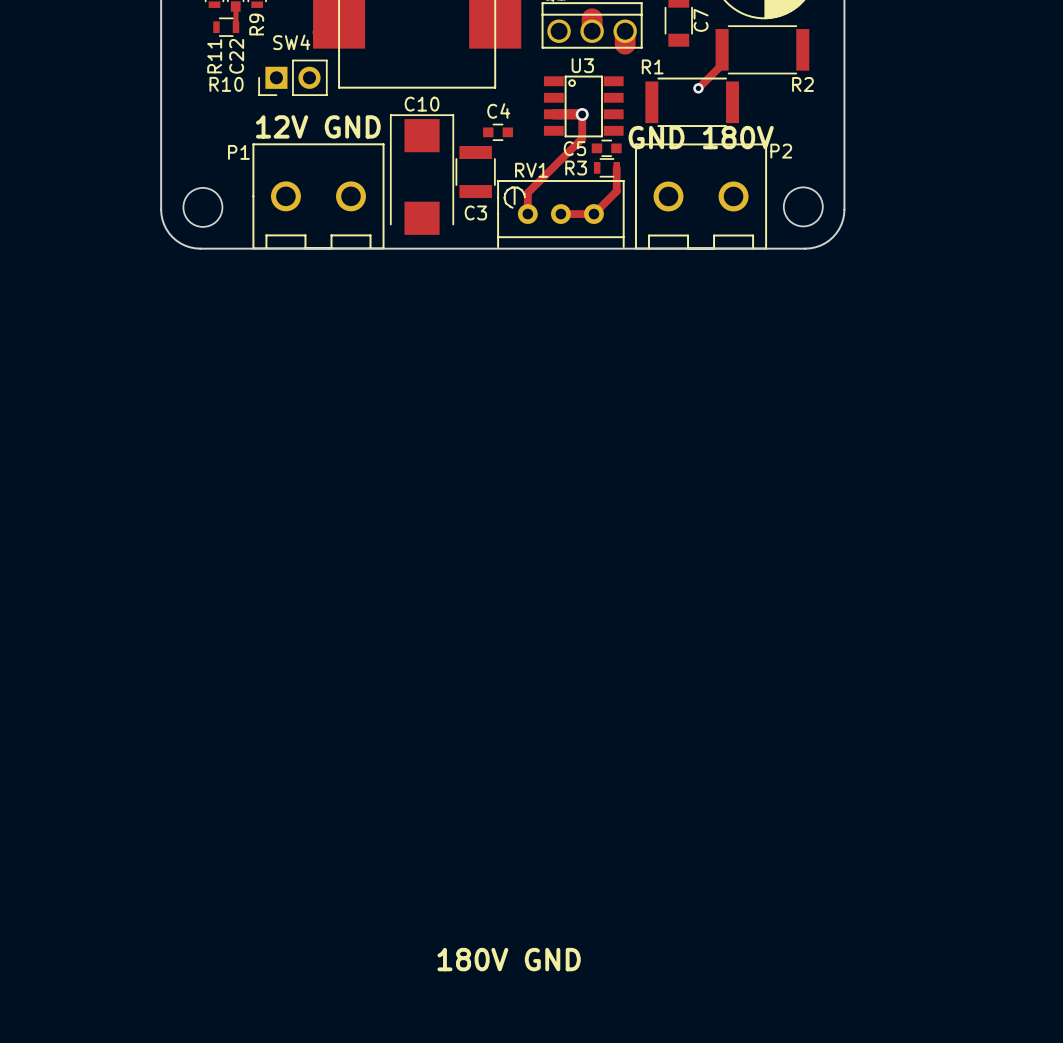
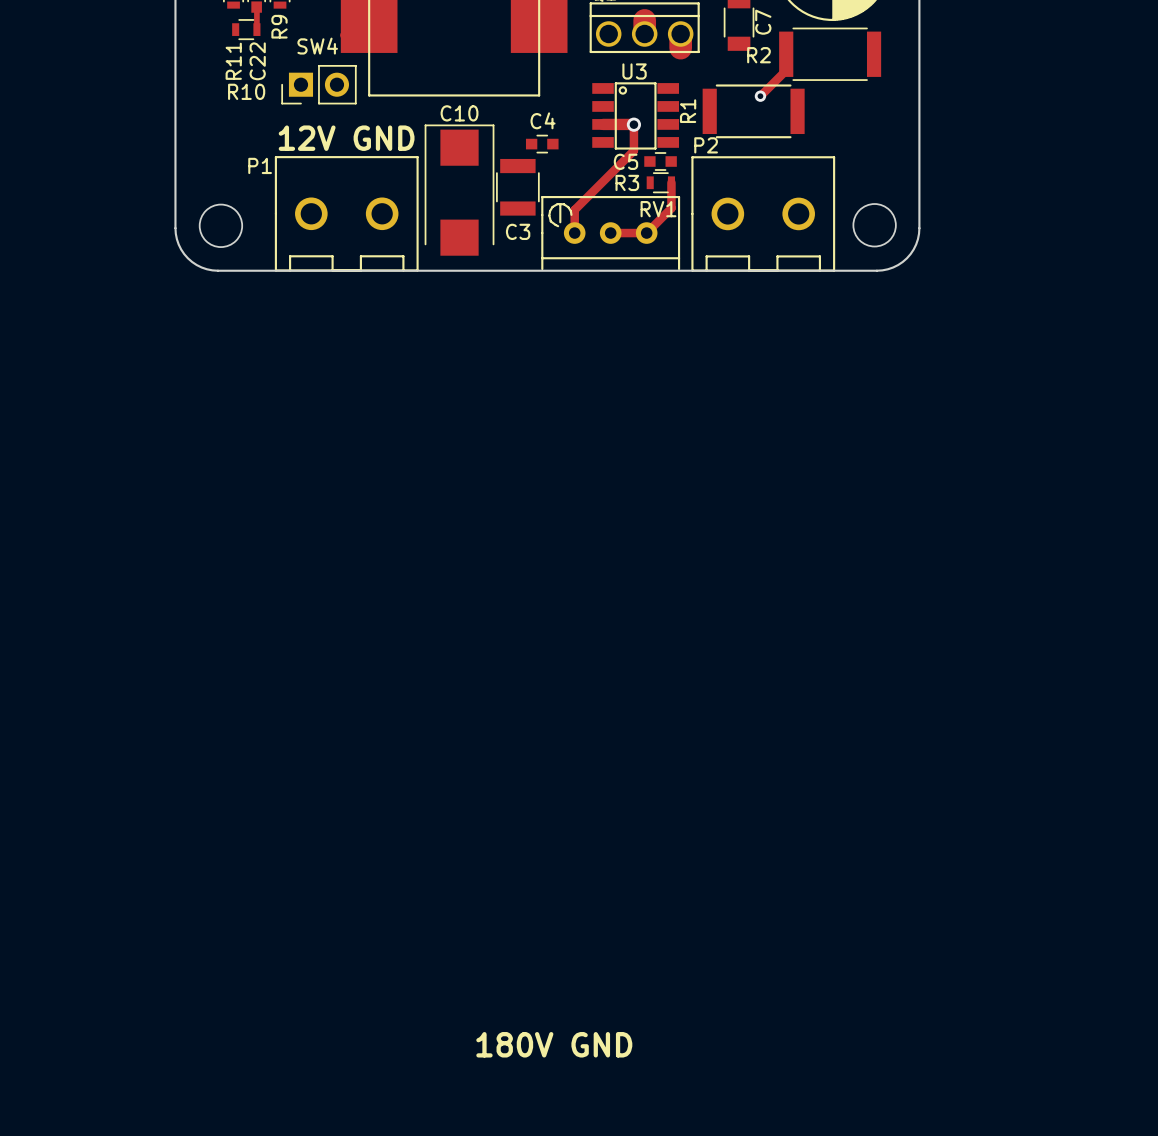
R1 name rotation: 0° (652, 66) -> 90° counterclockwise (688, 111)
R1 name position: R1 (652, 66) -> R1 (688, 111)
R2 name position: R2 (802, 84) -> R2 (758, 55)
text: GND 180V (701, 137) -> none
P2 name position: P2 (781, 151) -> P2 (706, 145)
RV1 name position: RV1 (531, 170) -> RV1 (658, 209)

